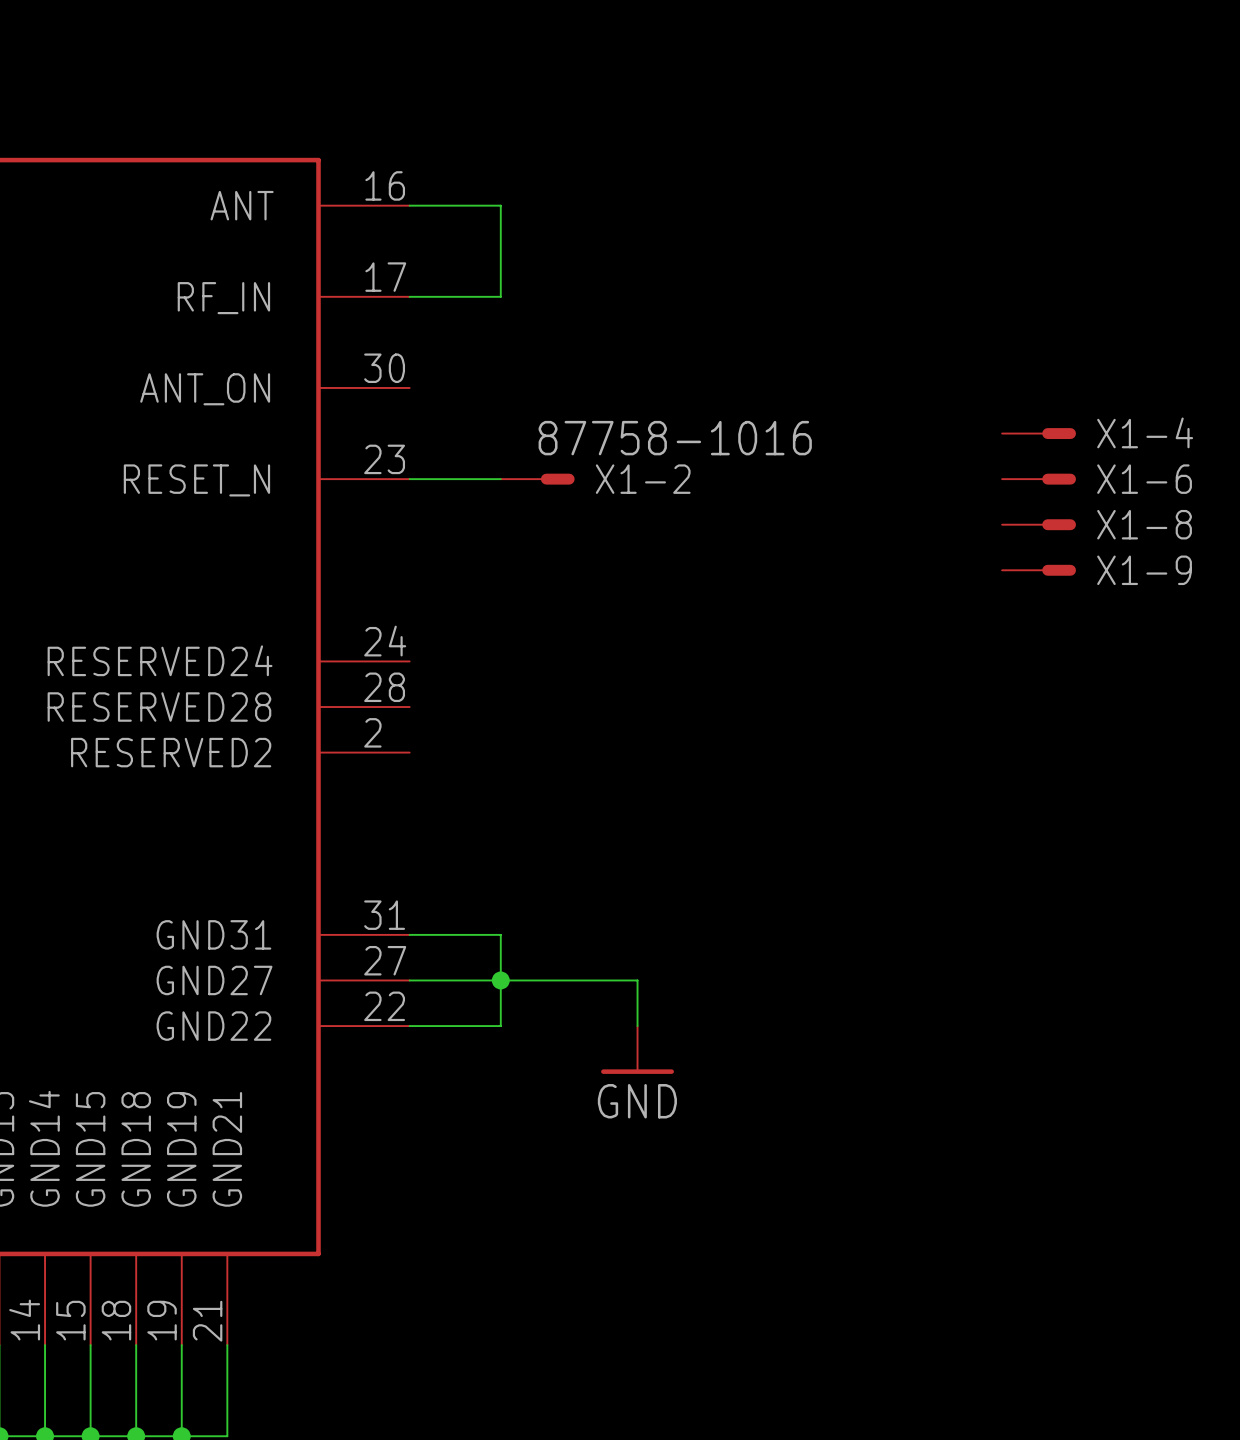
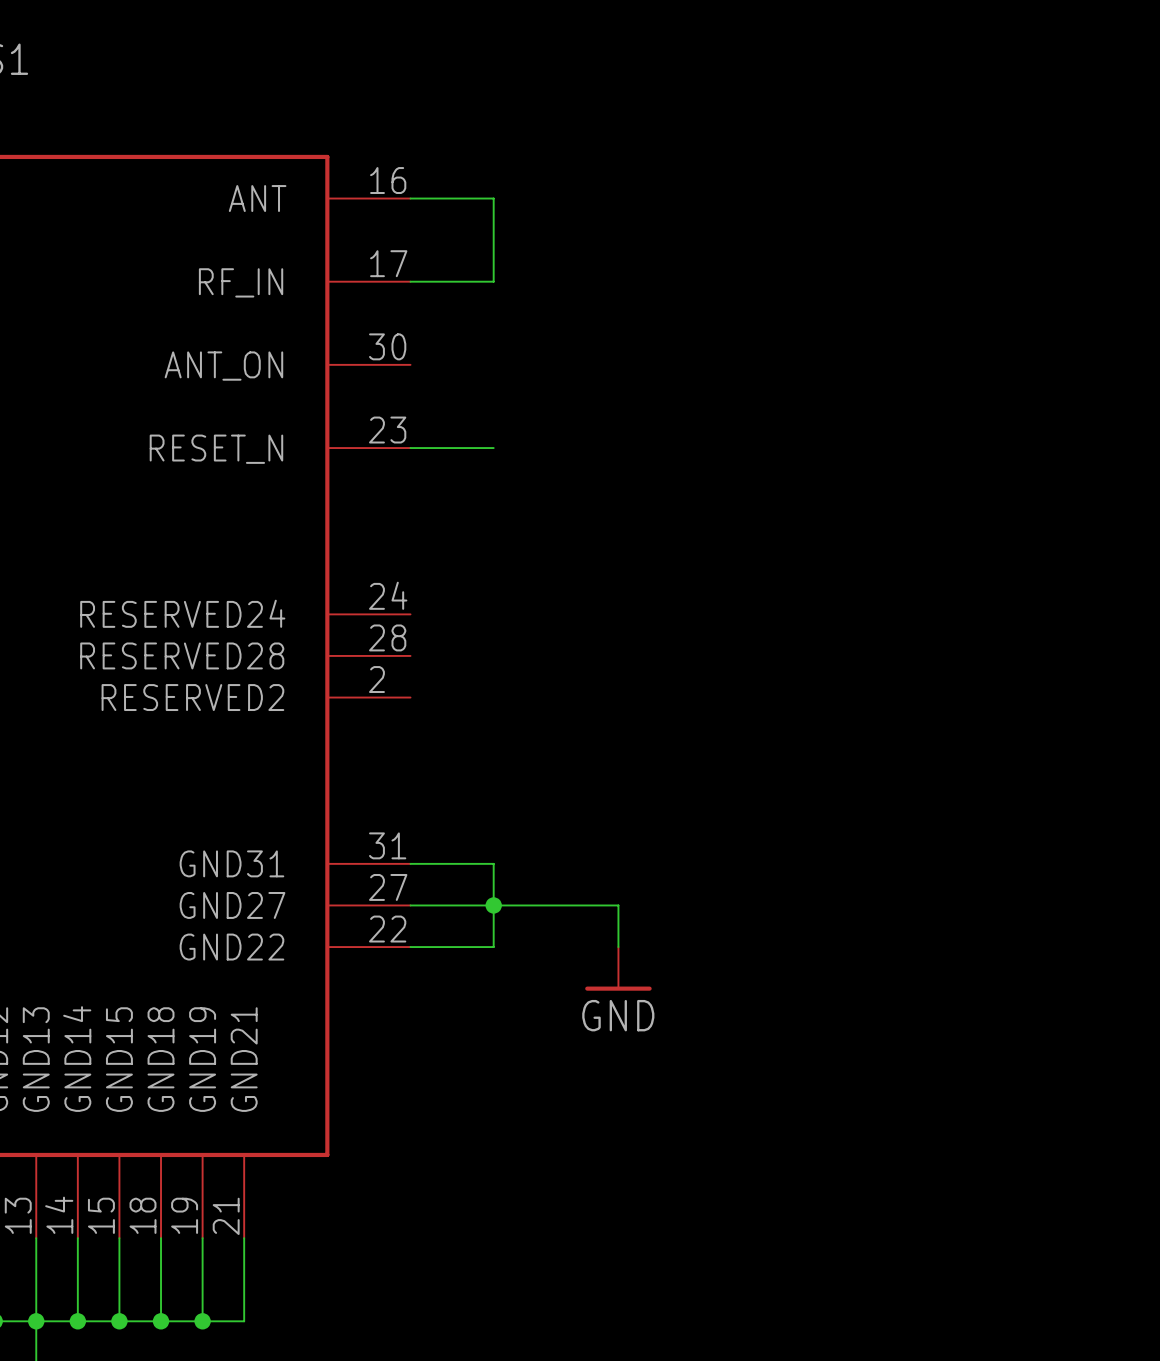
X1-4: (1039, 433) -> none
X1-2: 87758-1016 (537, 479) -> none
X1-6: (1039, 479) -> none
X1-8: (1039, 524) -> none
X1-9: (1039, 570) -> none

